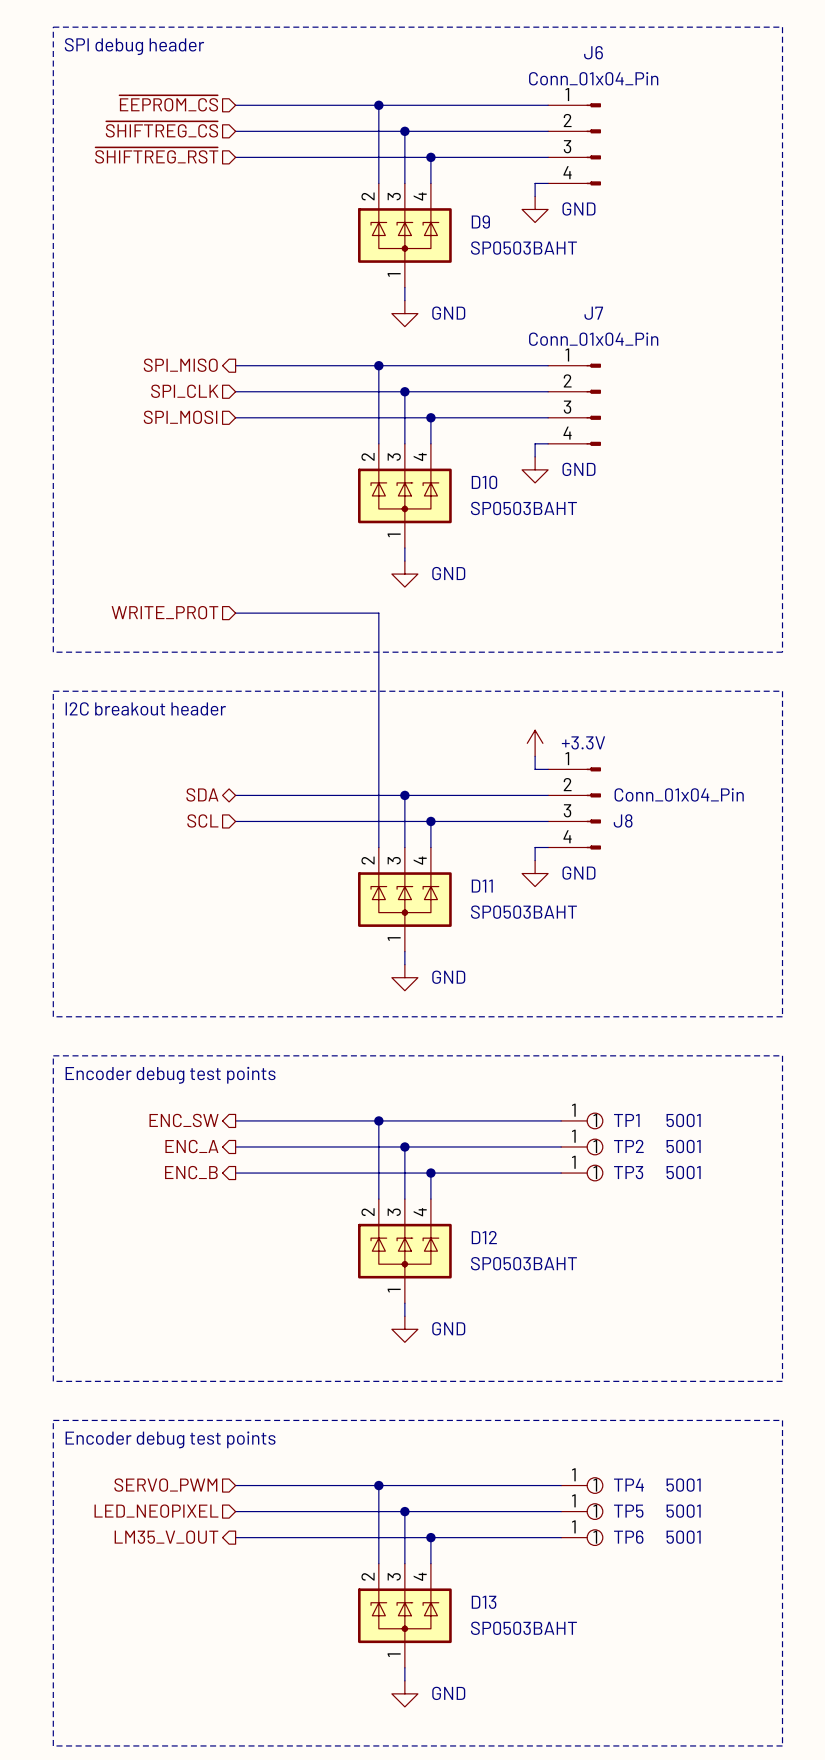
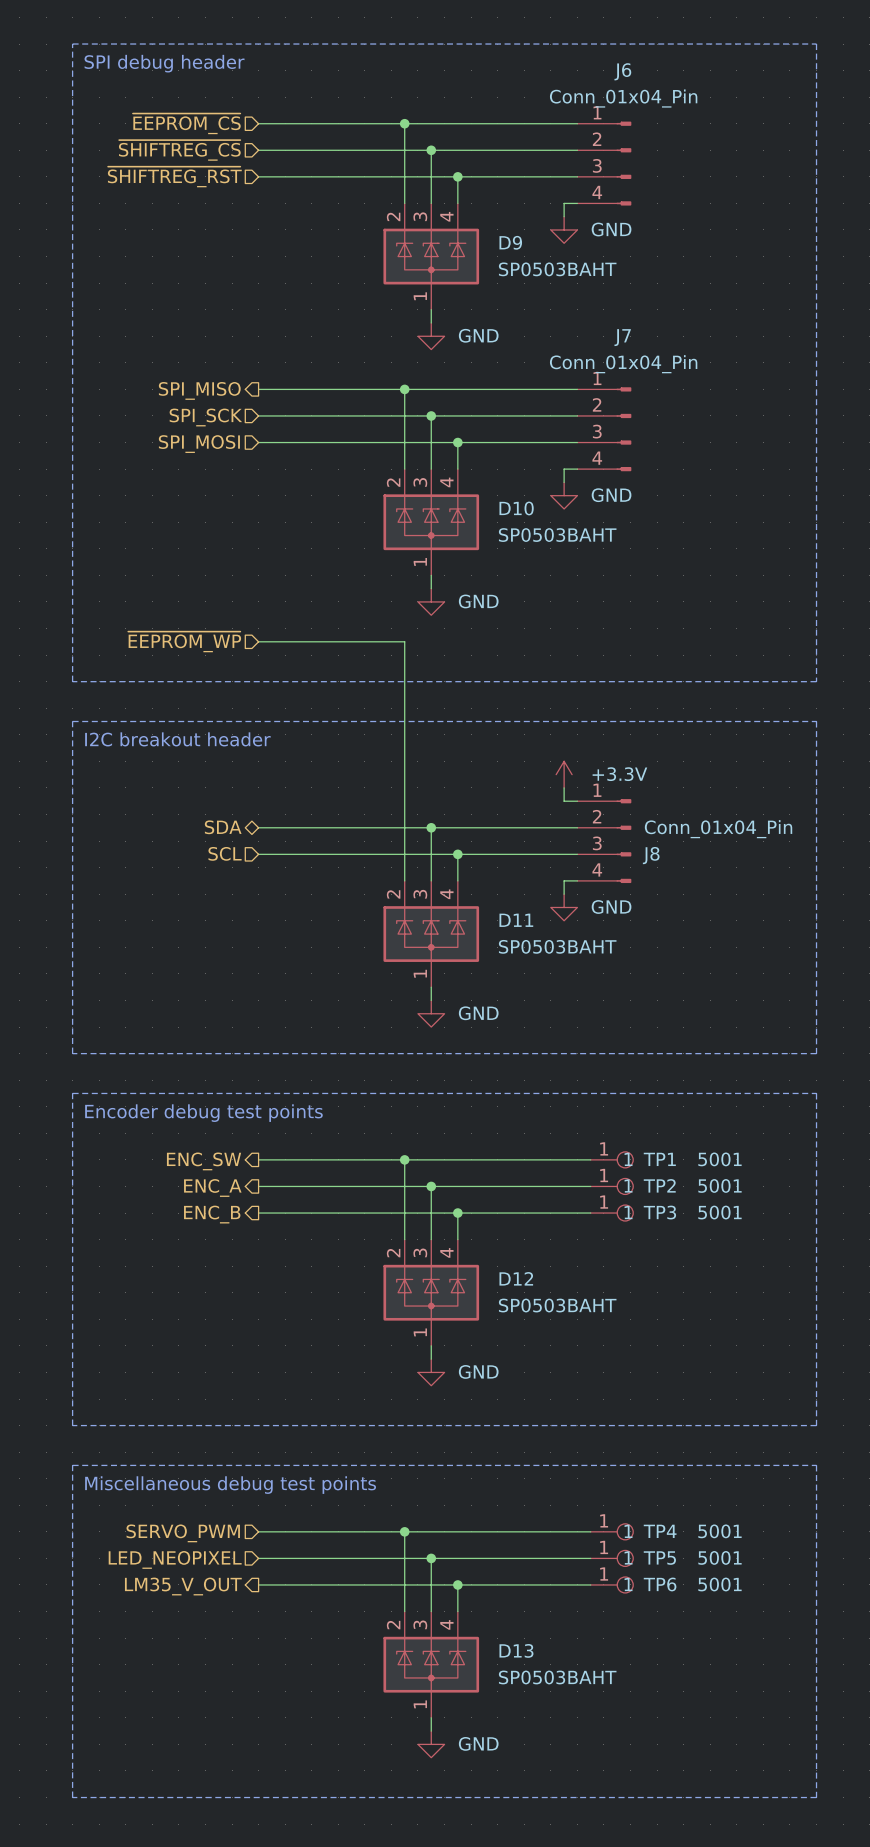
hierarchical label: SPI_CLK (184, 391) -> SPI_SCK (205, 417)
hierarchical label: WRITE_PROT (164, 612) -> ~{EEPROM_WP} (184, 641)
text: Encoder debug test points (170, 1439) -> Miscellaneous debug test points (230, 1485)

